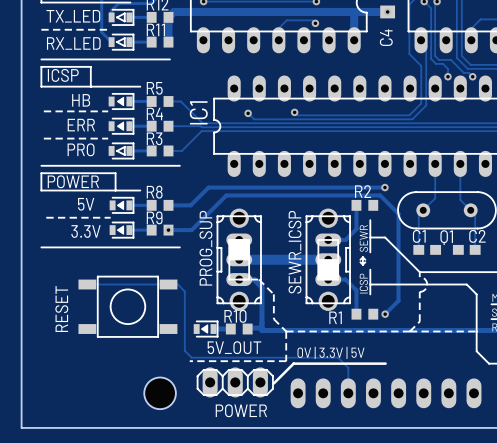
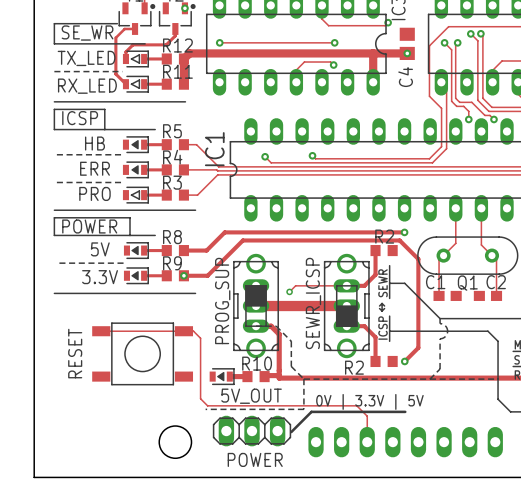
track: none -> (346, 285) (295, 285) (289, 291)
via: none -> (289, 291)
R1 name: R1 (335, 317) -> R2 (354, 367)

